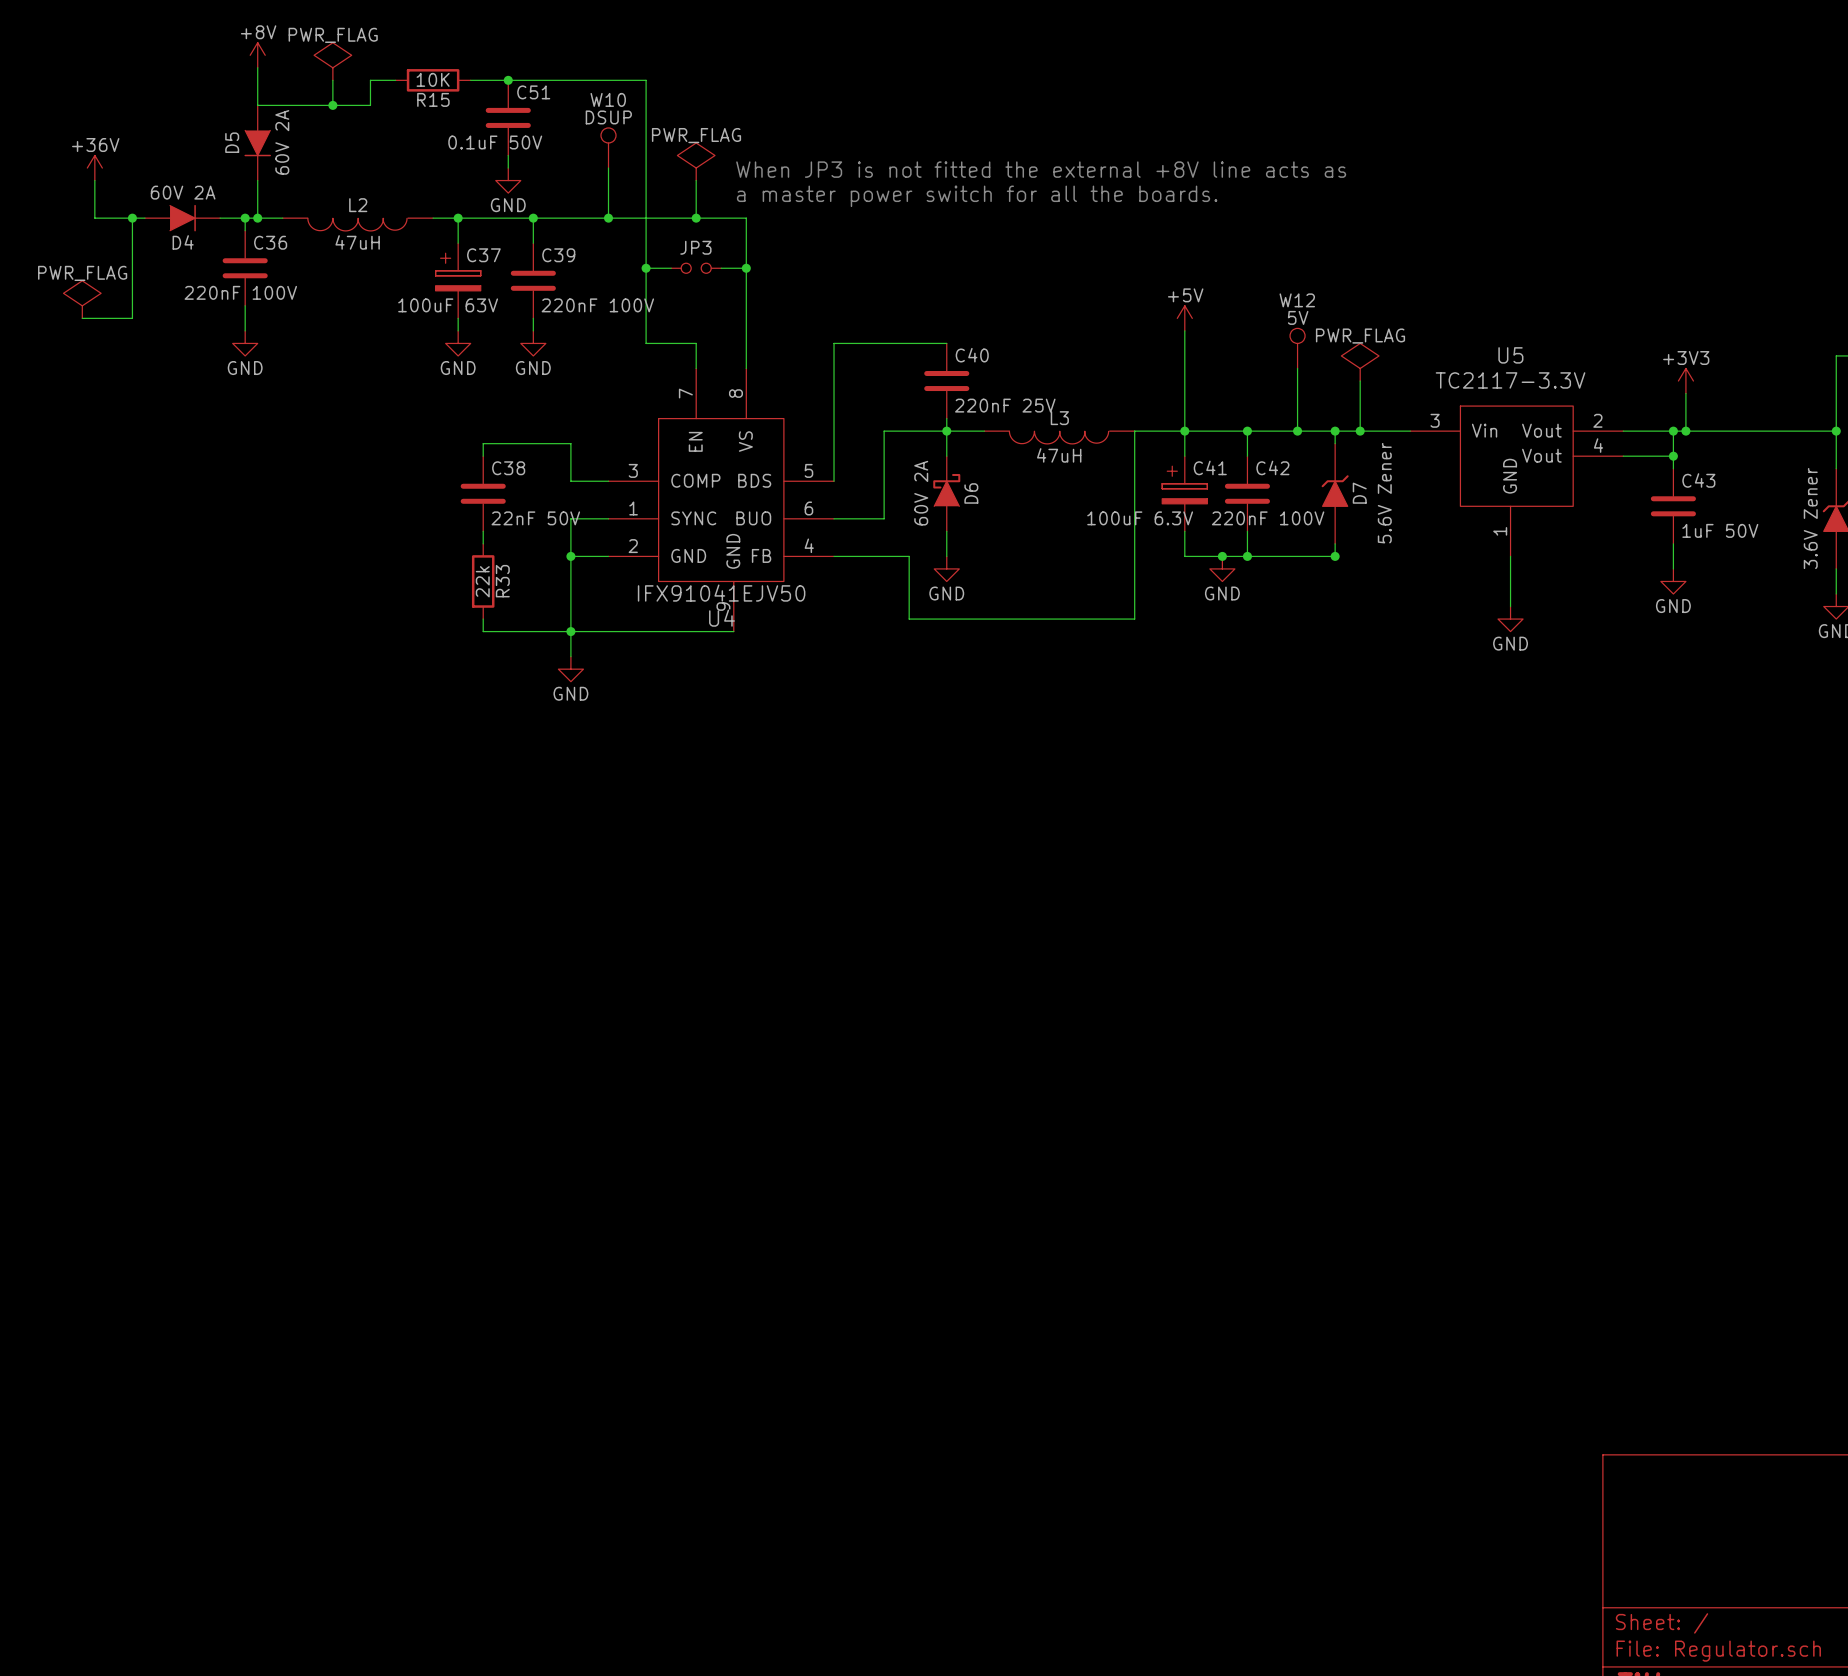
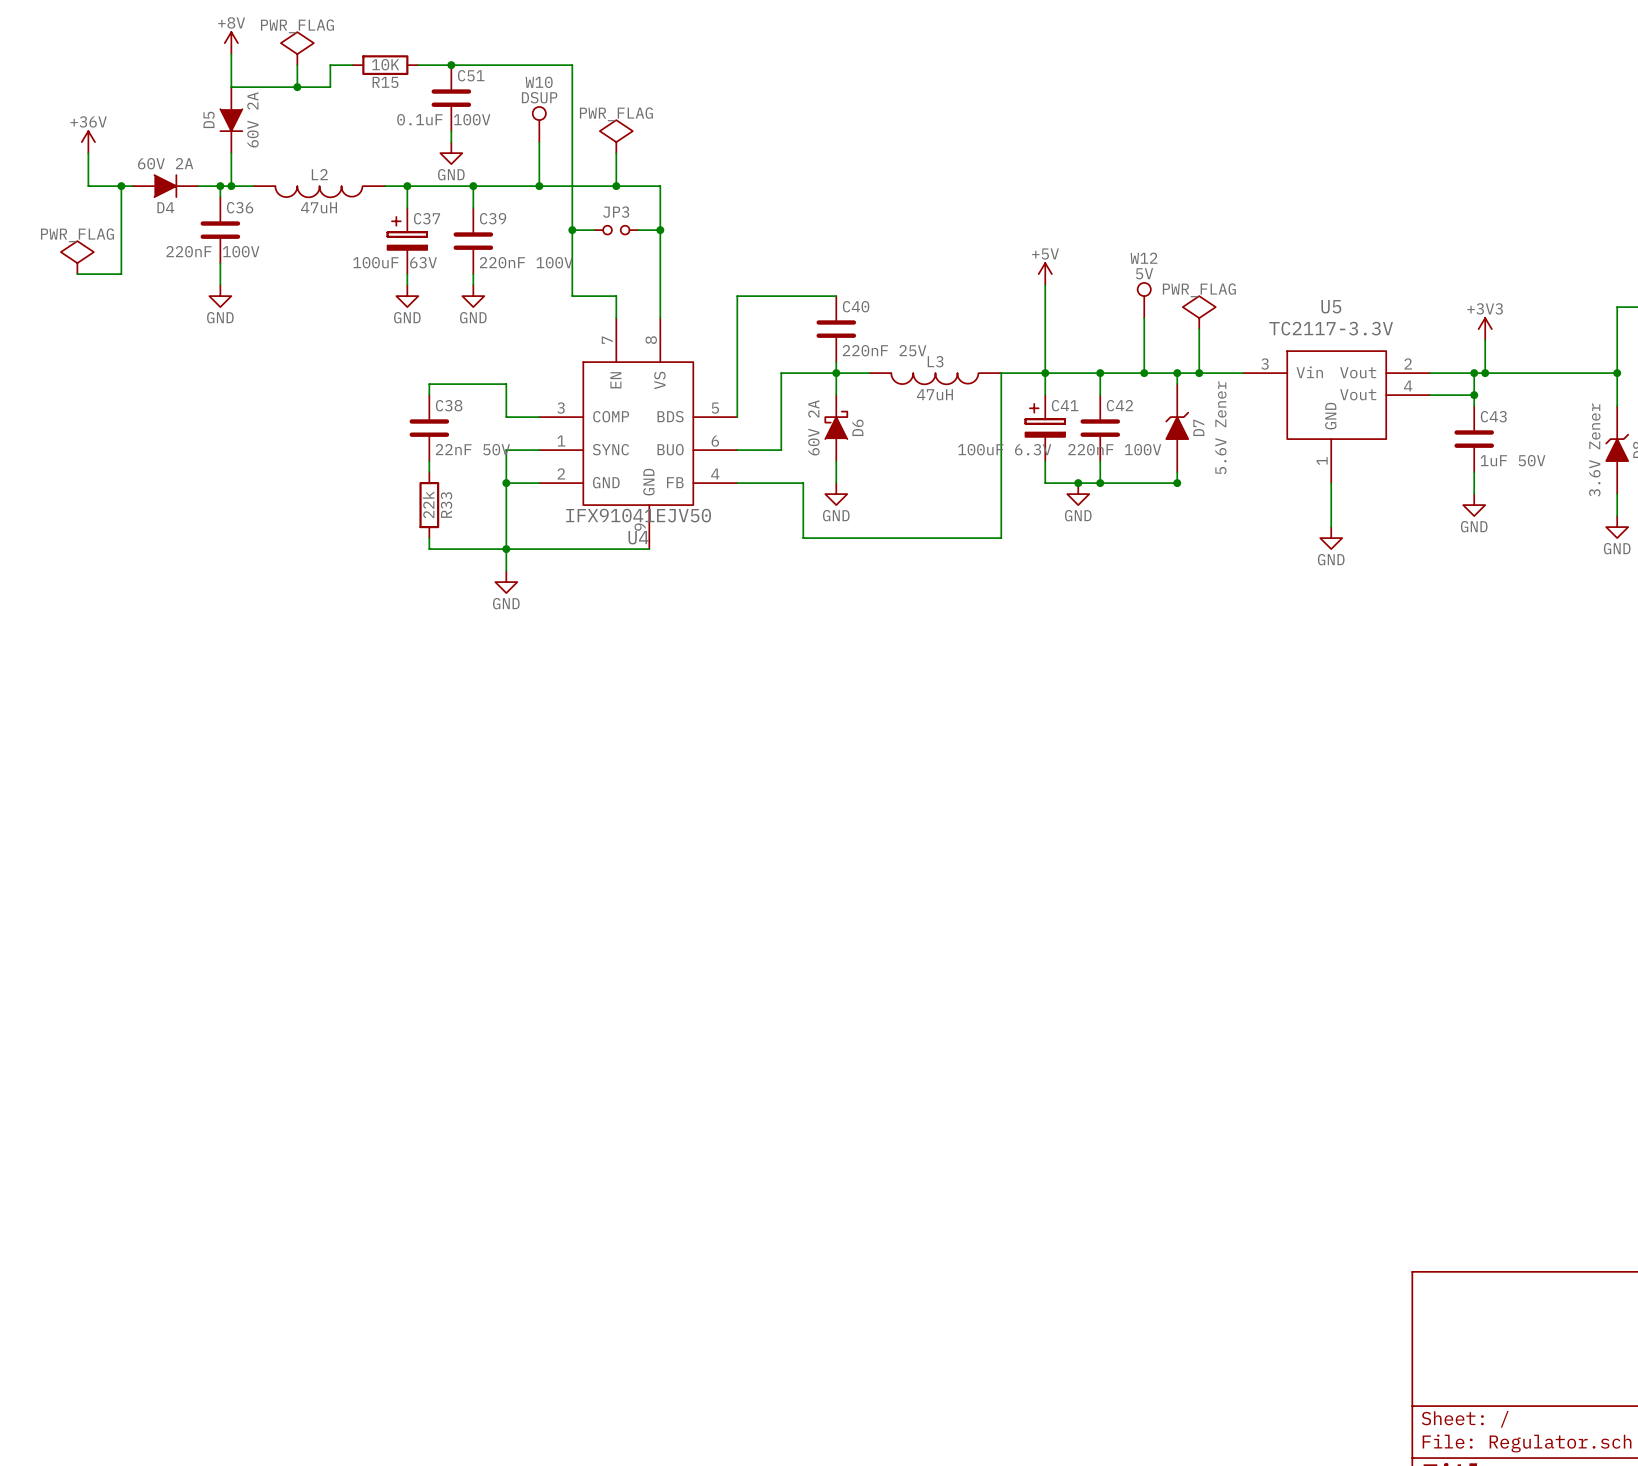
C51 value: 0.1uF 50V (495, 142) -> 0.1uF 100V (443, 119)
text: When JP3 is not fitted the external +8V line acts as (1041, 169) -> none
text: a master power switch for all the boards. (977, 196) -> none

